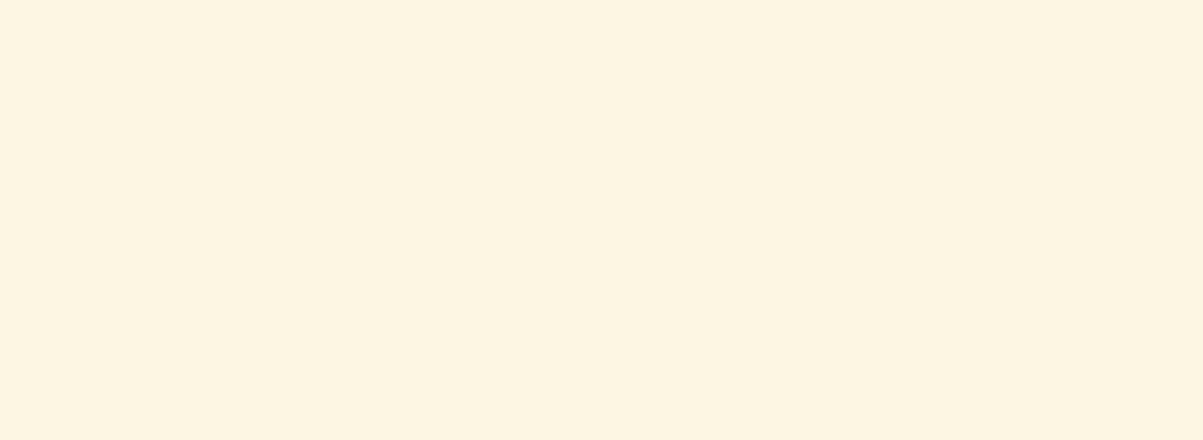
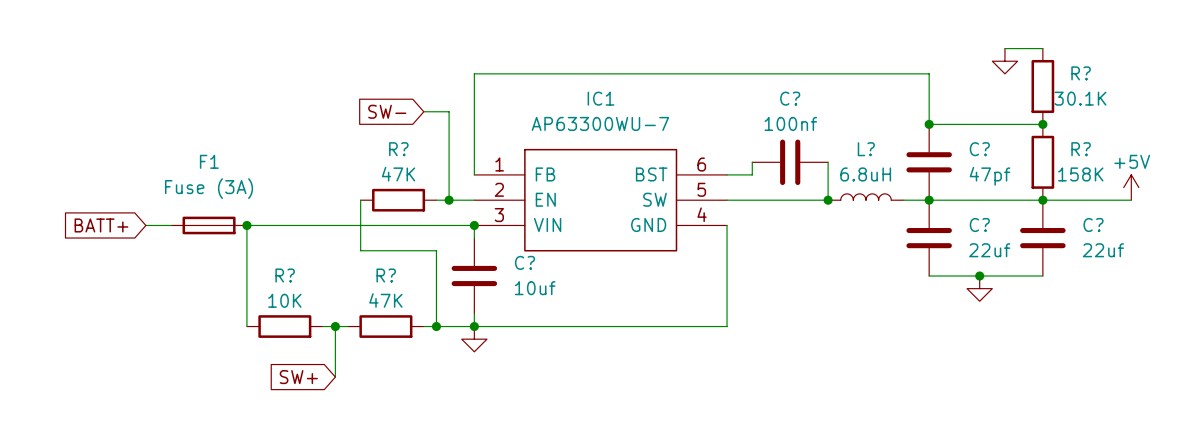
wire: none -> (1004, 48) (1042, 48)
power symbol: none -> (1004, 61)
R?: none -> 30.1K (1042, 86)
global label: none -> SW- (387, 111)
wire: none -> (423, 111) (449, 111) (449, 200)
junction: none -> (929, 124)
wire: none -> (1042, 124) (929, 124) (929, 73) (474, 73) (474, 174)
junction: none -> (1042, 124)
wire: none -> (752, 162) (752, 174) (727, 174)
C?: none -> 100nf (790, 162)
wire: none -> (828, 162) (828, 200) (727, 200)
C?: none -> 47pf (929, 162)
R?: none -> 158K (1042, 162)
power symbol: none -> +5V (1131, 187)
L?: none -> 6.8uH (866, 197)
wire: none -> (360, 200) (360, 250) (436, 250) (436, 326)
R?: none -> 47K (398, 200)
wire: none -> (436, 200) (474, 200)
junction: none -> (449, 200)
IC1: none -> AP63300WU-7 (600, 200)
junction: none -> (828, 200)
wire: none -> (903, 200) (1131, 200)
junction: none -> (929, 200)
junction: none -> (1042, 200)
global label: none -> BATT+ (101, 225)
wire: none -> (145, 225) (171, 225)
F1: none -> Fuse (3A) (209, 225)
junction: none -> (246, 225)
junction: none -> (474, 225)
wire: none -> (727, 225) (727, 326) (423, 326)
wire: none -> (474, 238) (474, 225) (246, 225) (246, 326)
C?: none -> 22uf (929, 238)
C?: none -> 22uf (1042, 238)
C?: none -> 10uf (474, 276)
wire: none -> (929, 276) (1042, 276)
junction: none -> (979, 276)
power symbol: none -> (979, 288)
wire: none -> (474, 313) (474, 326)
R?: none -> 10K (284, 326)
wire: none -> (322, 326) (348, 326)
wire: none -> (335, 326) (335, 377)
junction: none -> (335, 326)
R?: none -> 47K (385, 326)
junction: none -> (436, 326)
junction: none -> (474, 326)
power symbol: none -> (474, 339)
global label: none -> SW+ (298, 377)

